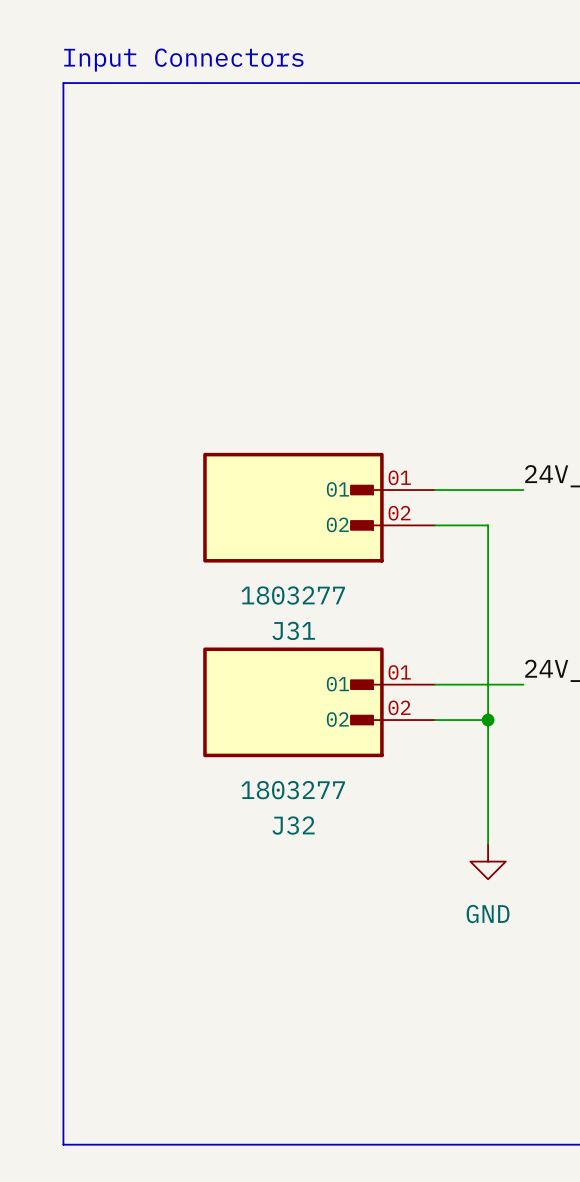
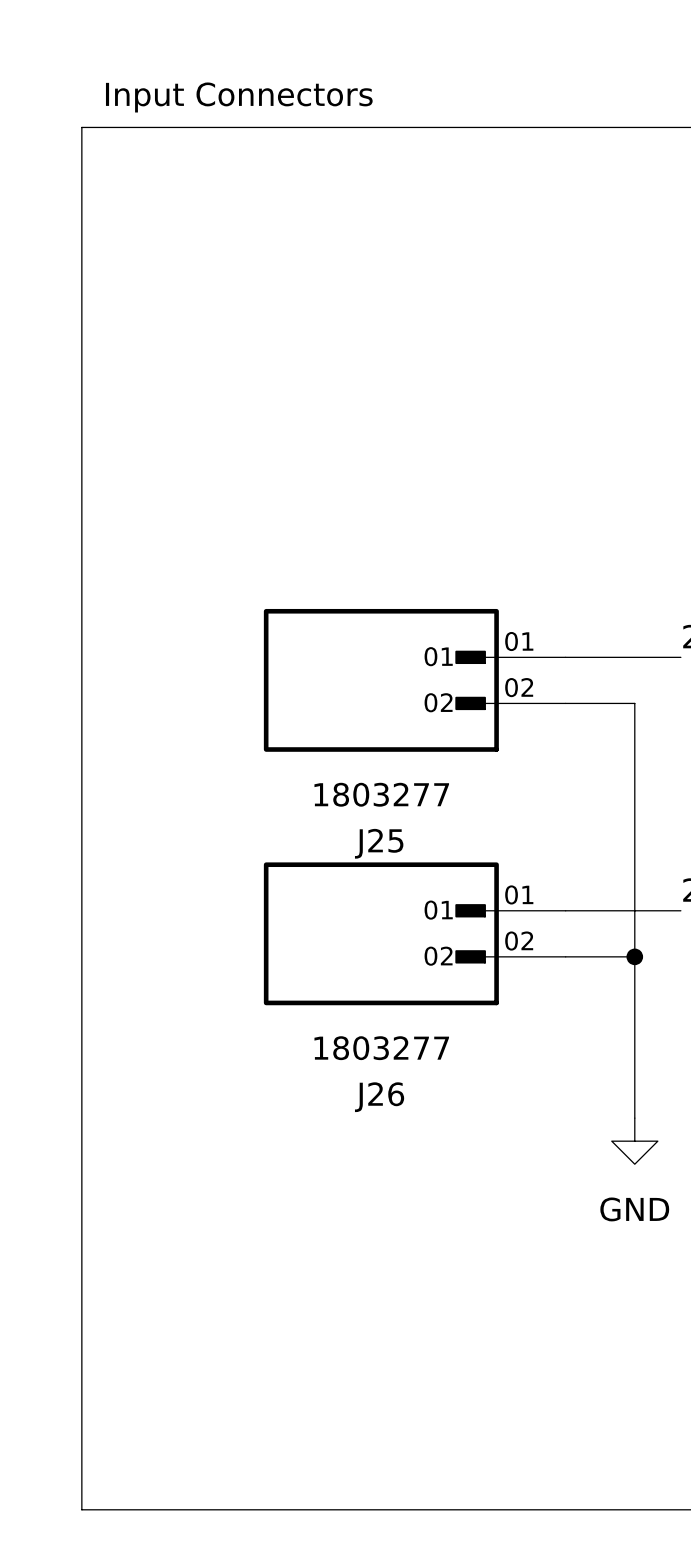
J31 name: J31 (293, 630) -> J25 (379, 843)
J32 name: J32 (293, 825) -> J26 (379, 1097)

